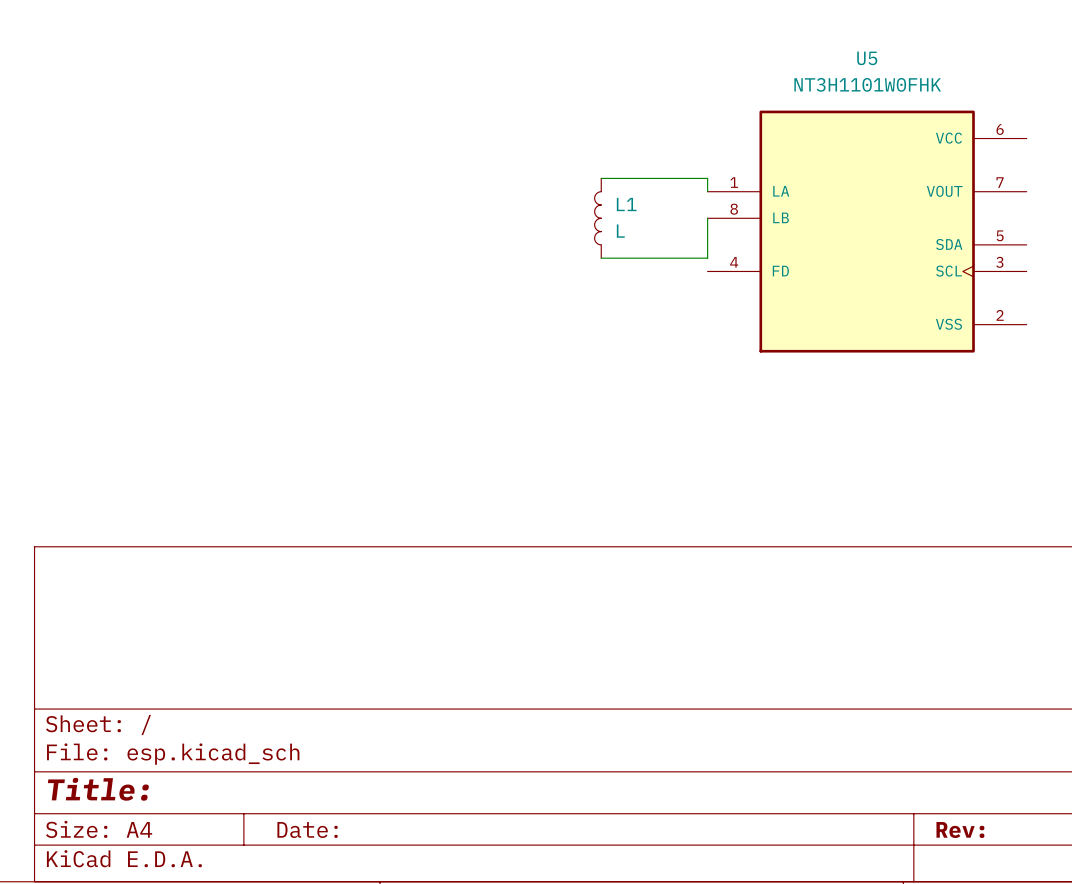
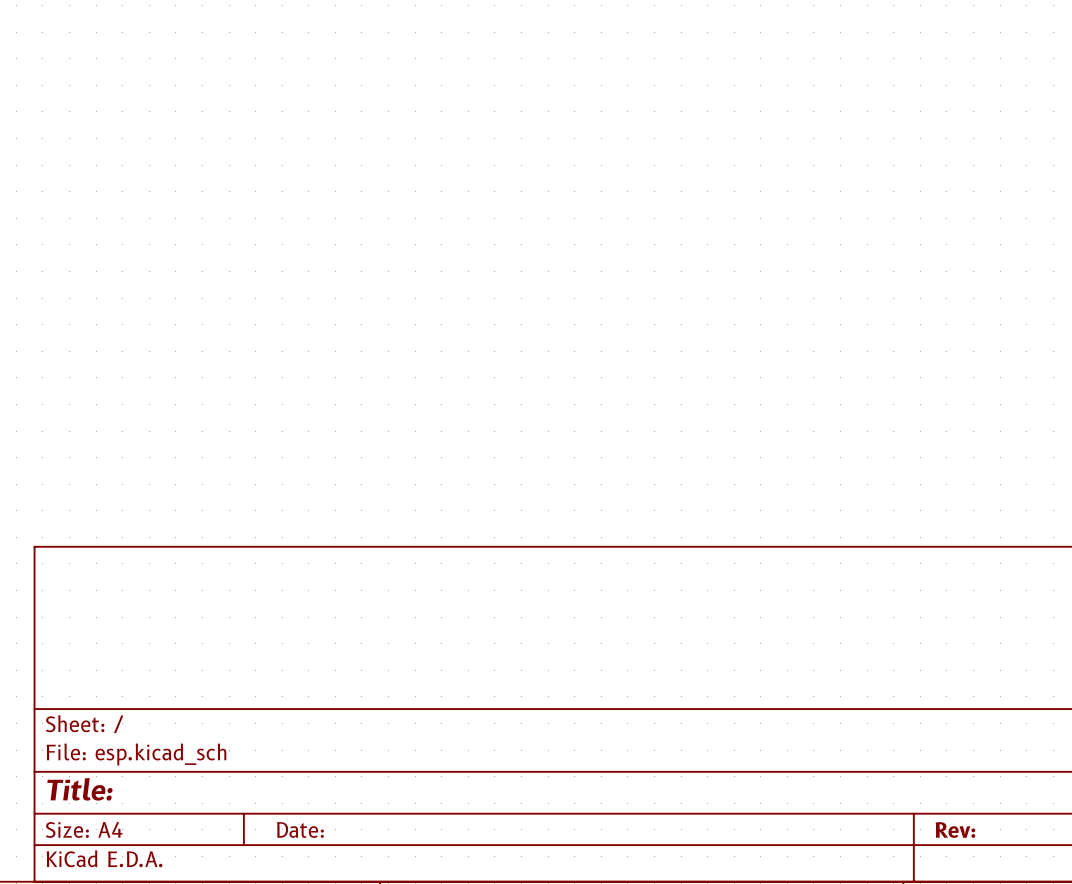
wire: (601, 178) (707, 178) (707, 191) -> none
L1: L (597, 218) -> none
wire: (707, 218) (707, 258) (601, 258) -> none
U5: NT3H1101W0FHK (867, 231) -> none

